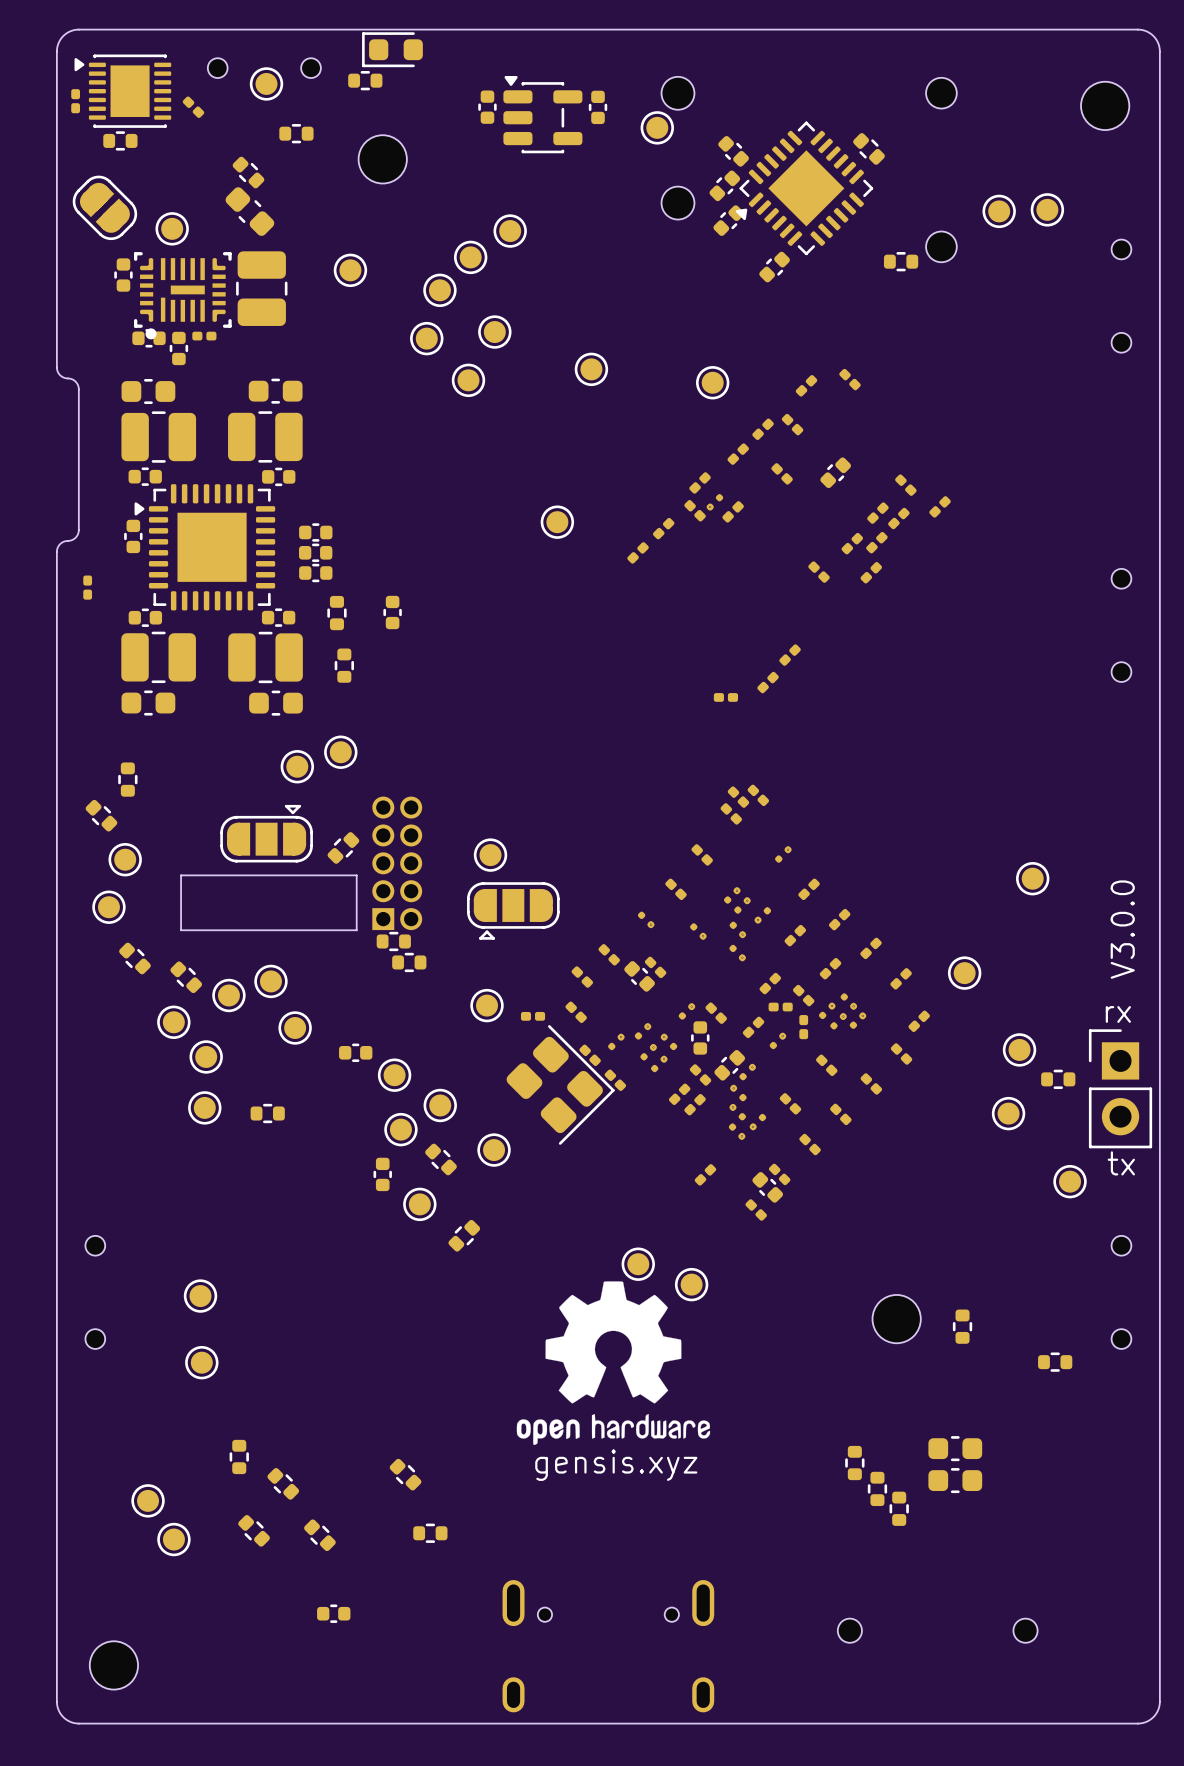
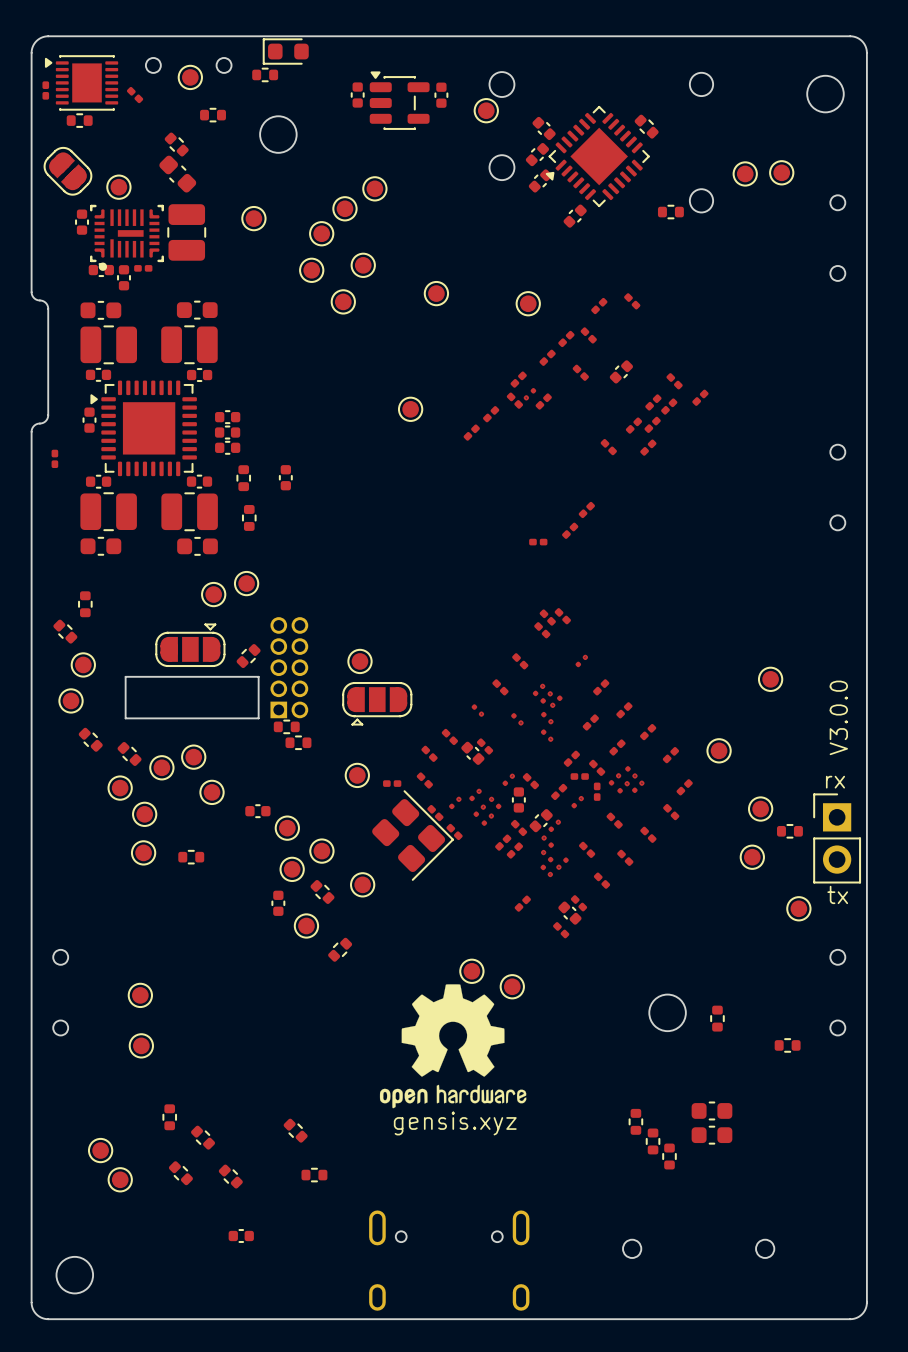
part: none -> (539, 689)
part: (732, 895) -> none
part: none -> (546, 697)
part: (742, 905) -> none
part: none -> (556, 701)
part: (762, 915) -> none

